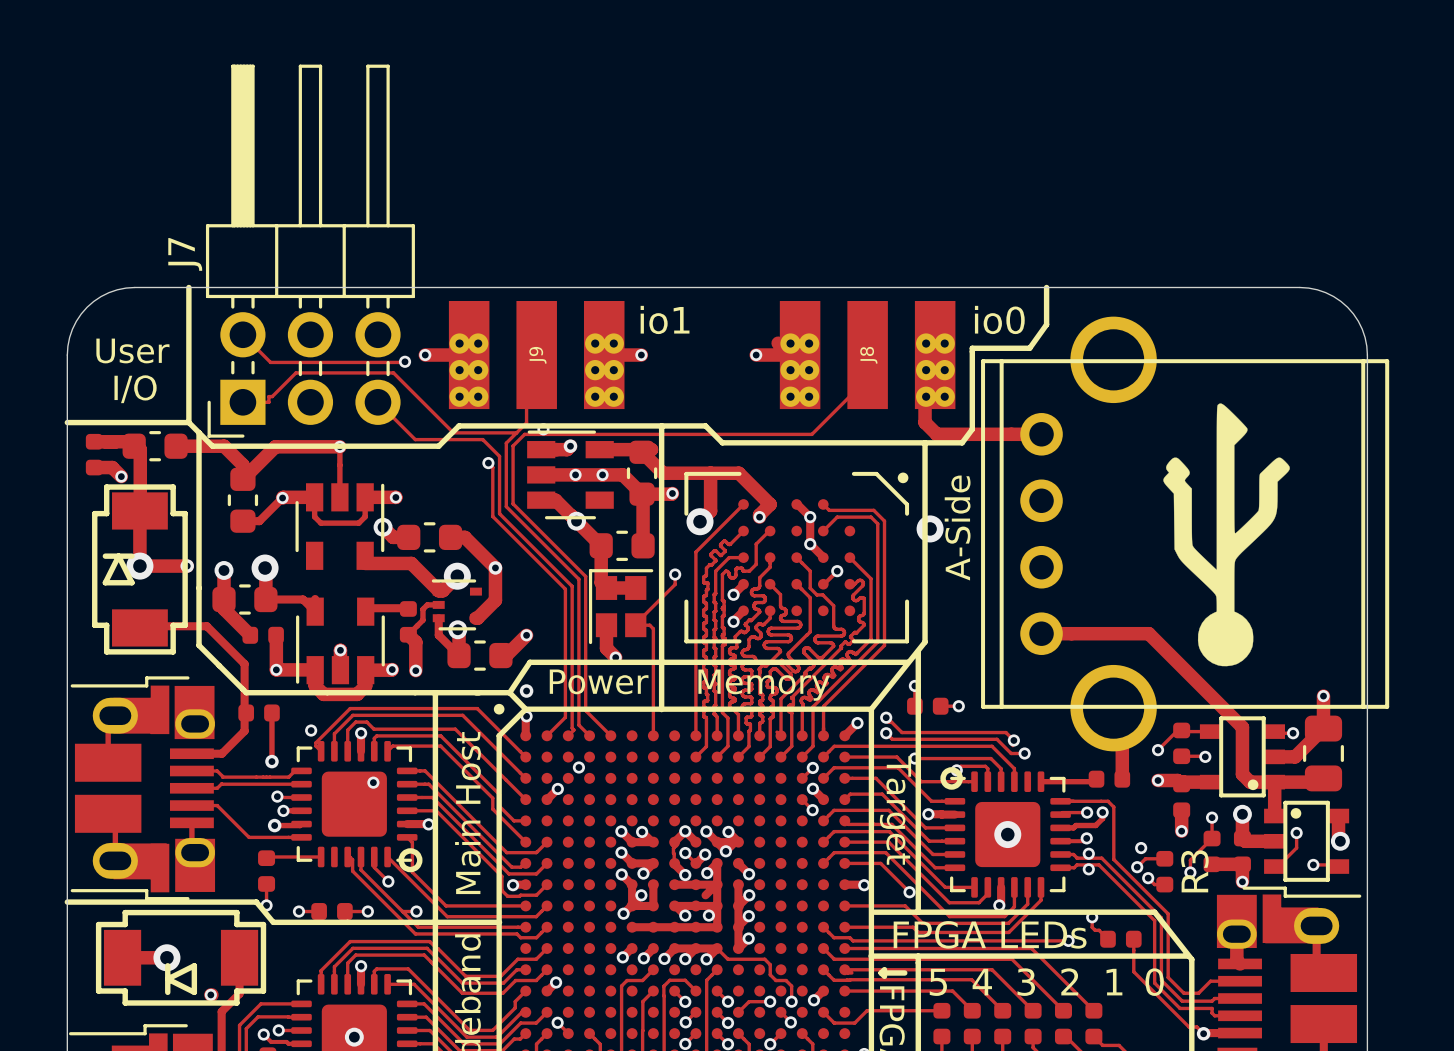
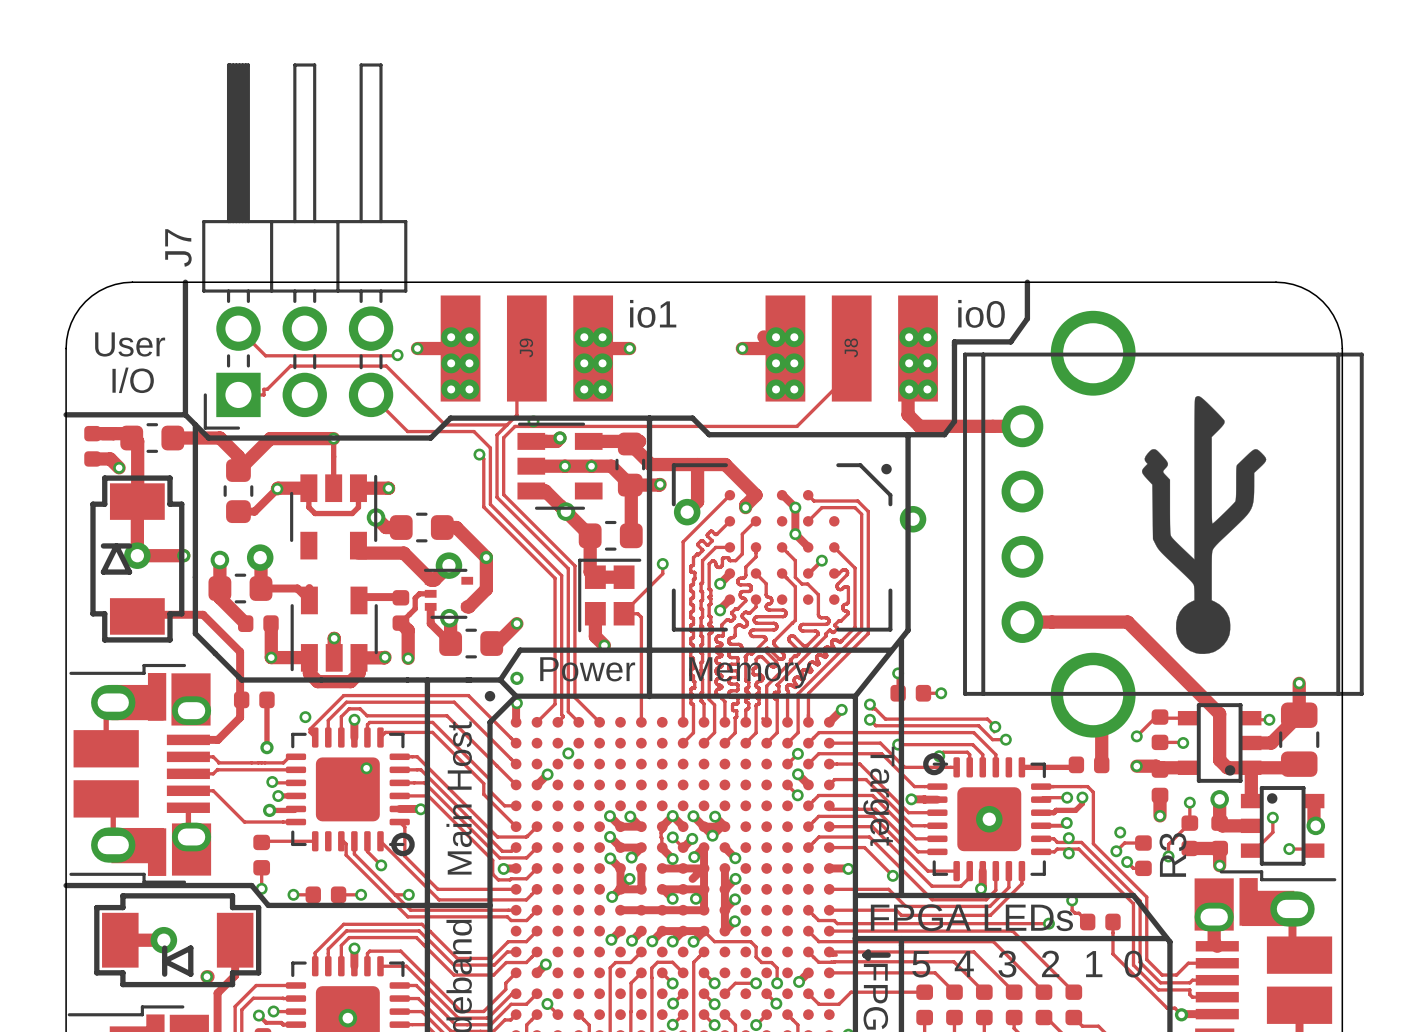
text: A-Side (957, 528) -> none

